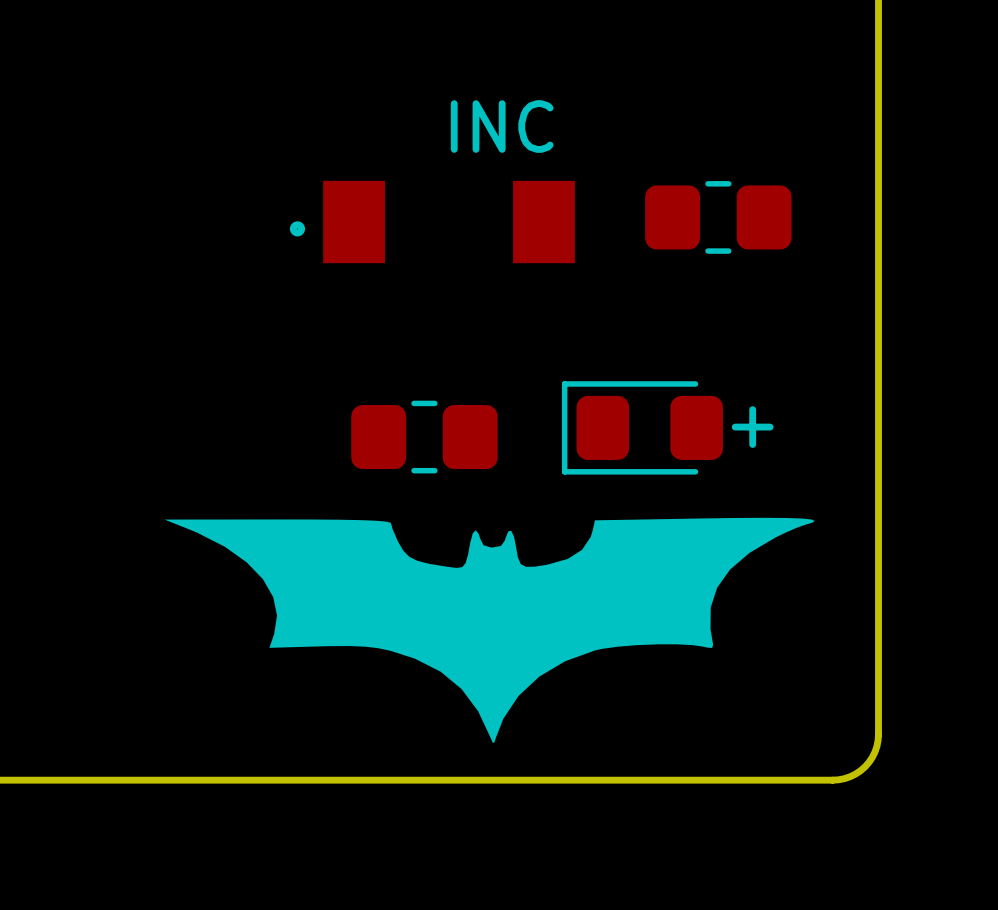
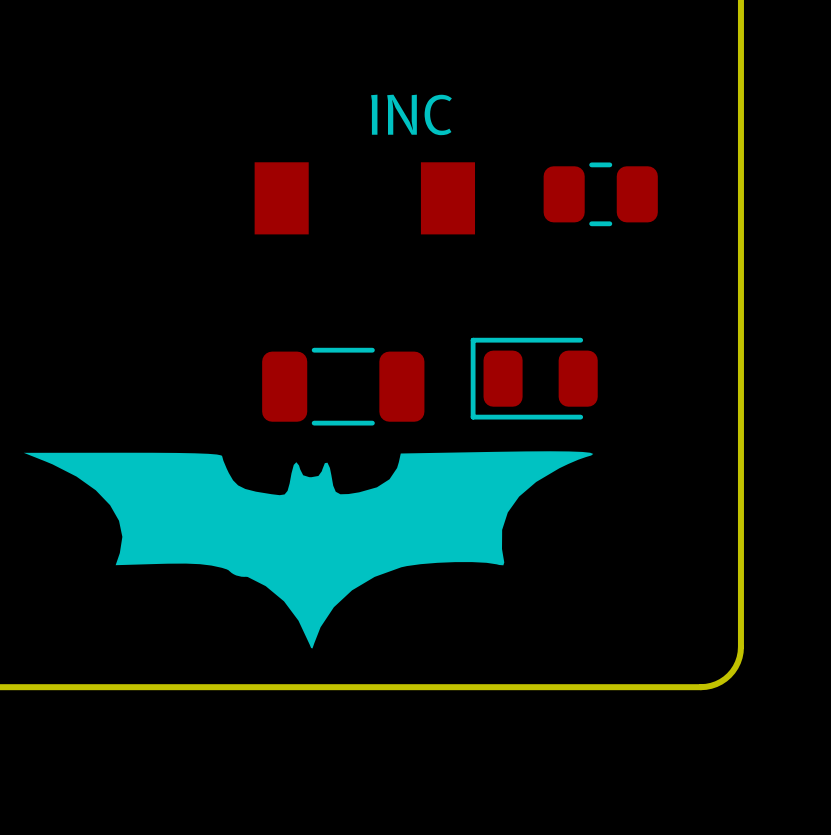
part footprint: [645, 181, 792, 254] -> [543, 162, 658, 227]
drawing: [289, 221, 306, 237] -> none
part footprint: [561, 381, 723, 475] -> [470, 337, 598, 420]
part footprint: [351, 400, 498, 474] -> [262, 347, 425, 426]
text: + (752, 427) -> none
drawing: [164, 517, 815, 743] -> none
part: none -> (308, 549)

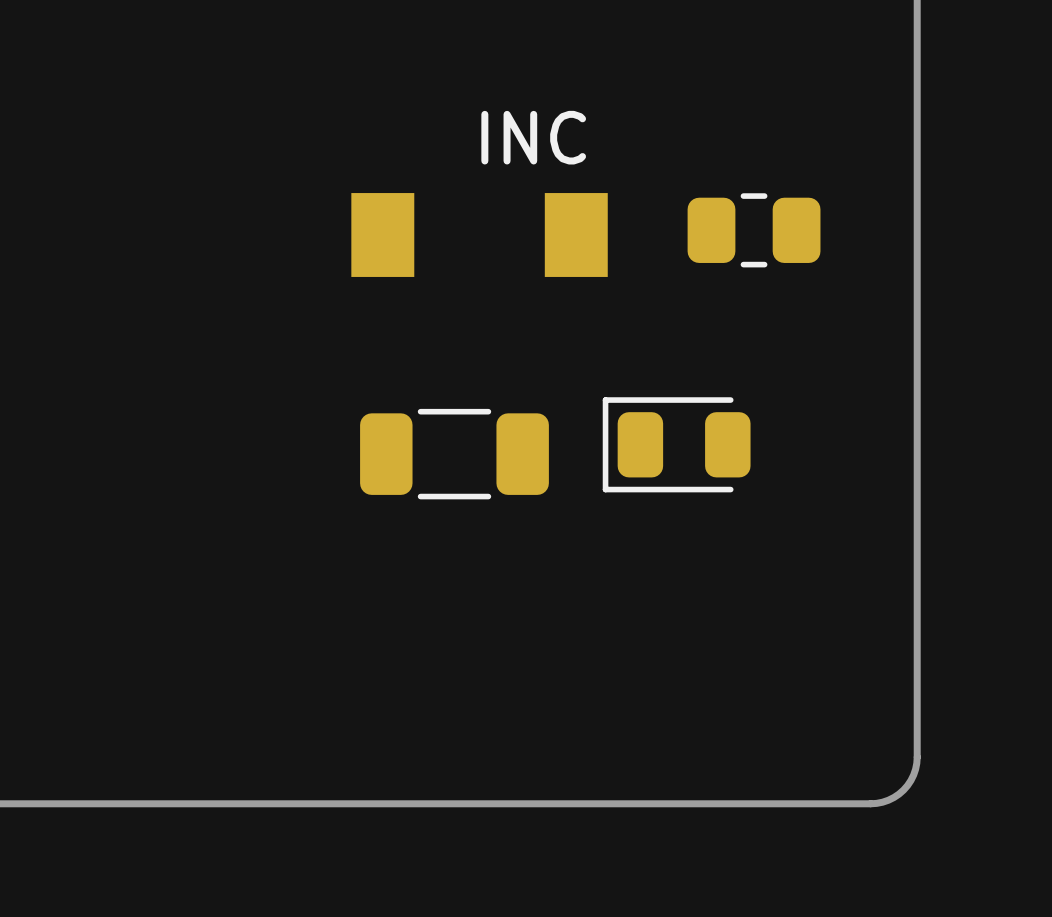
part: (308, 549) -> none

